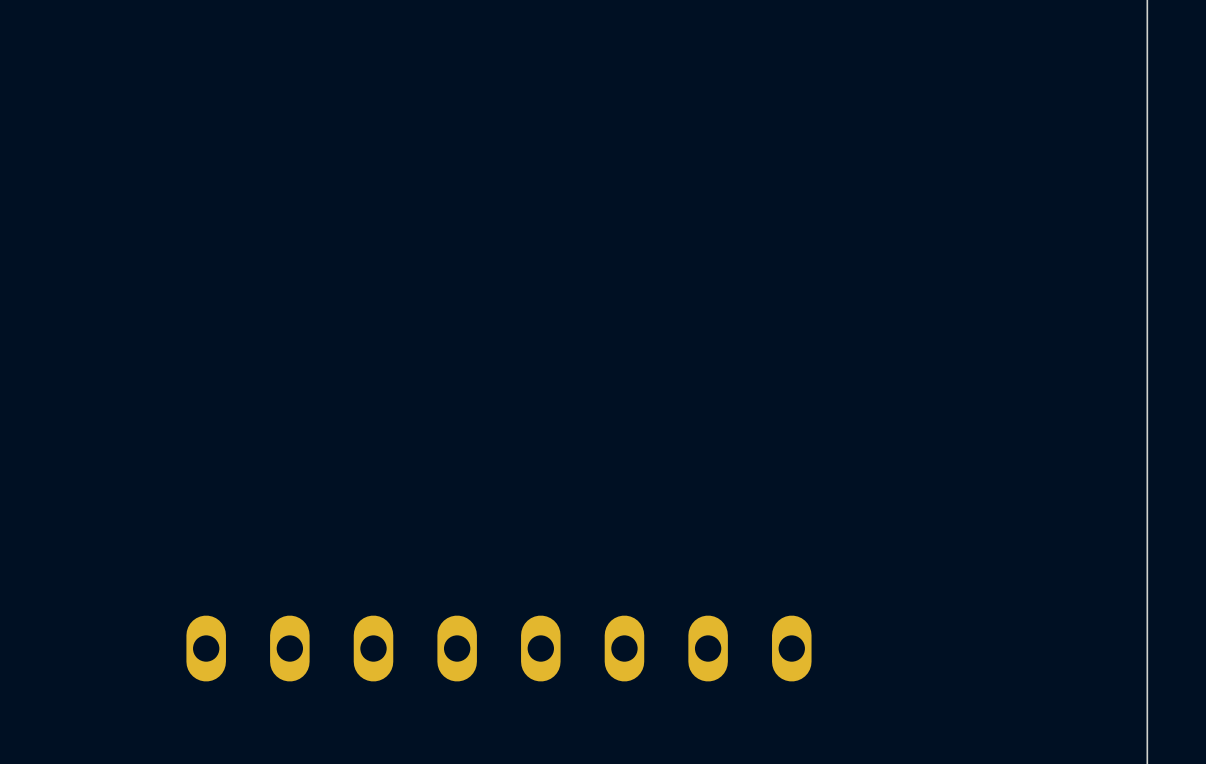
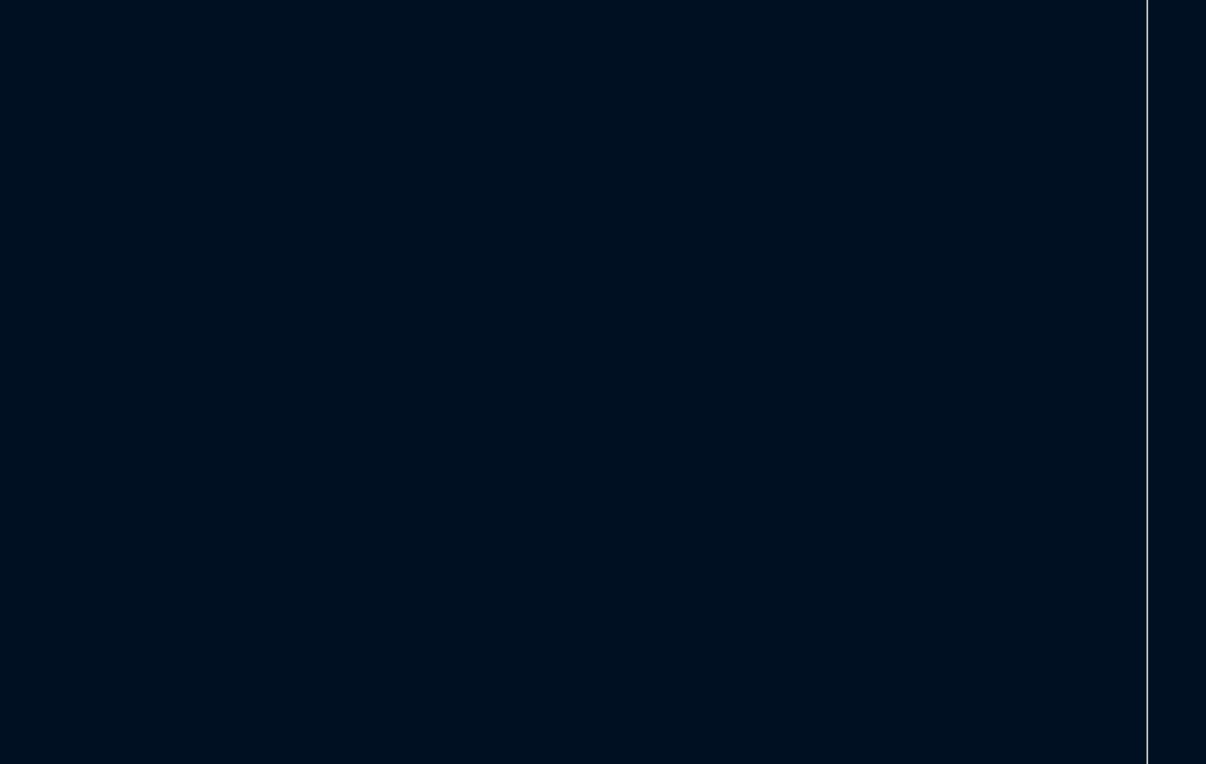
part: (498, 648) -> none

